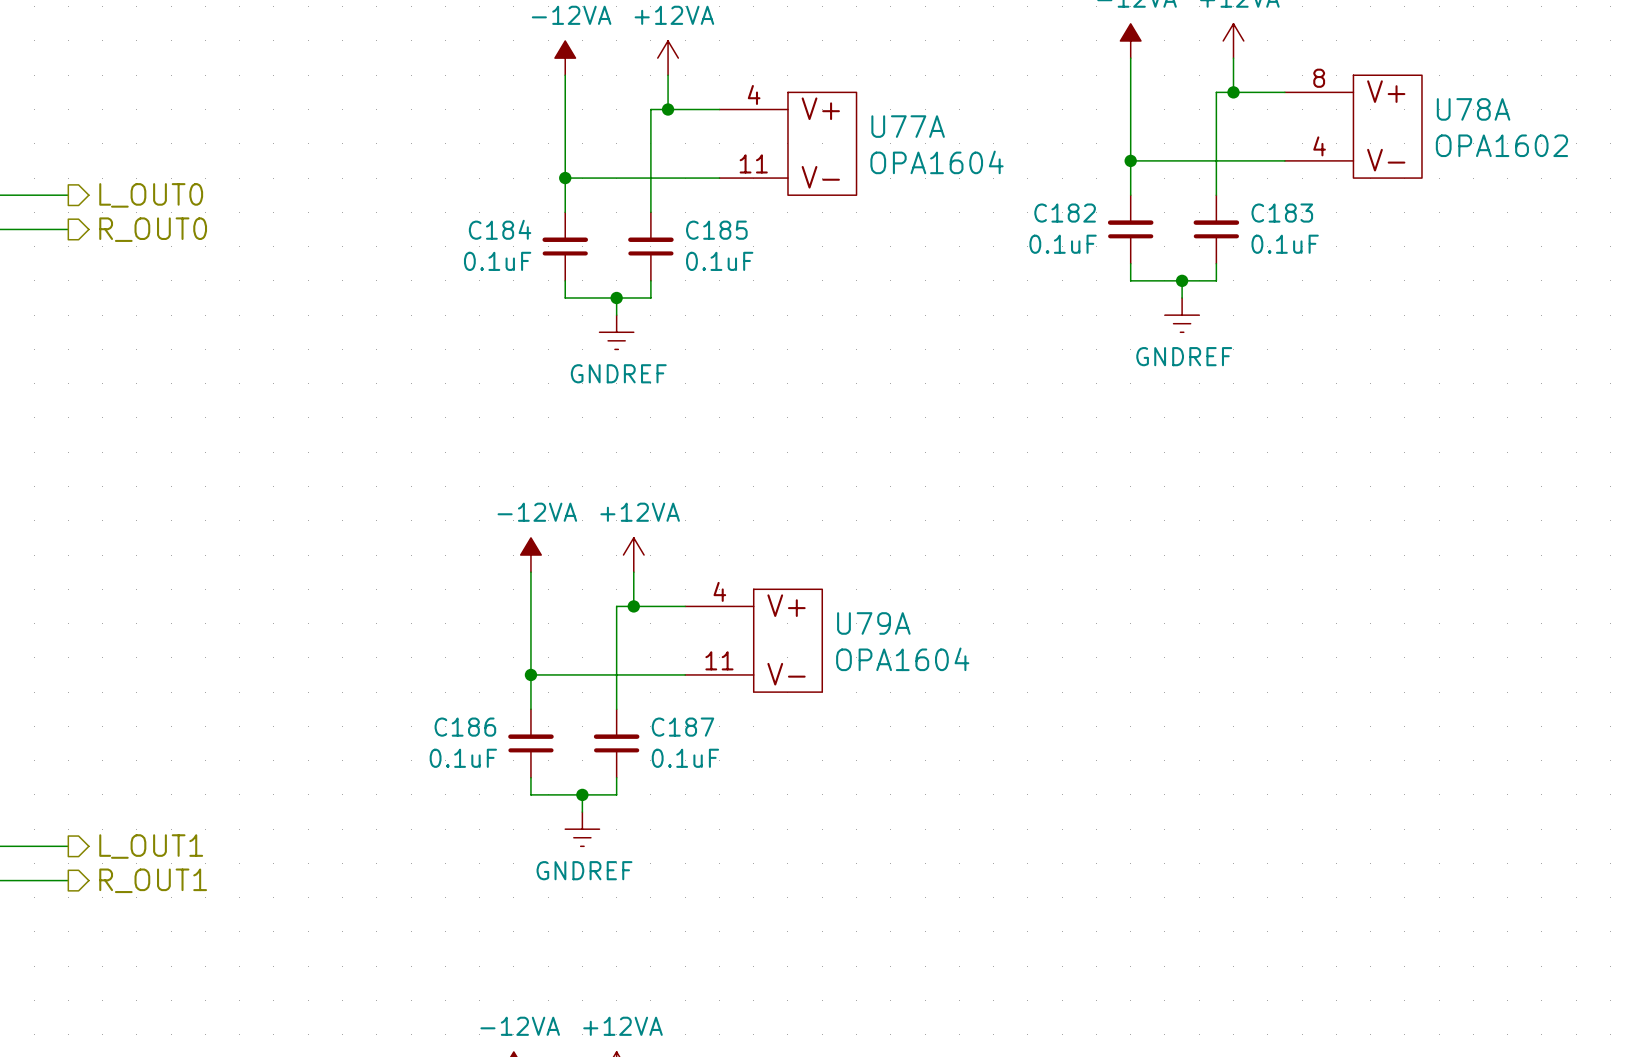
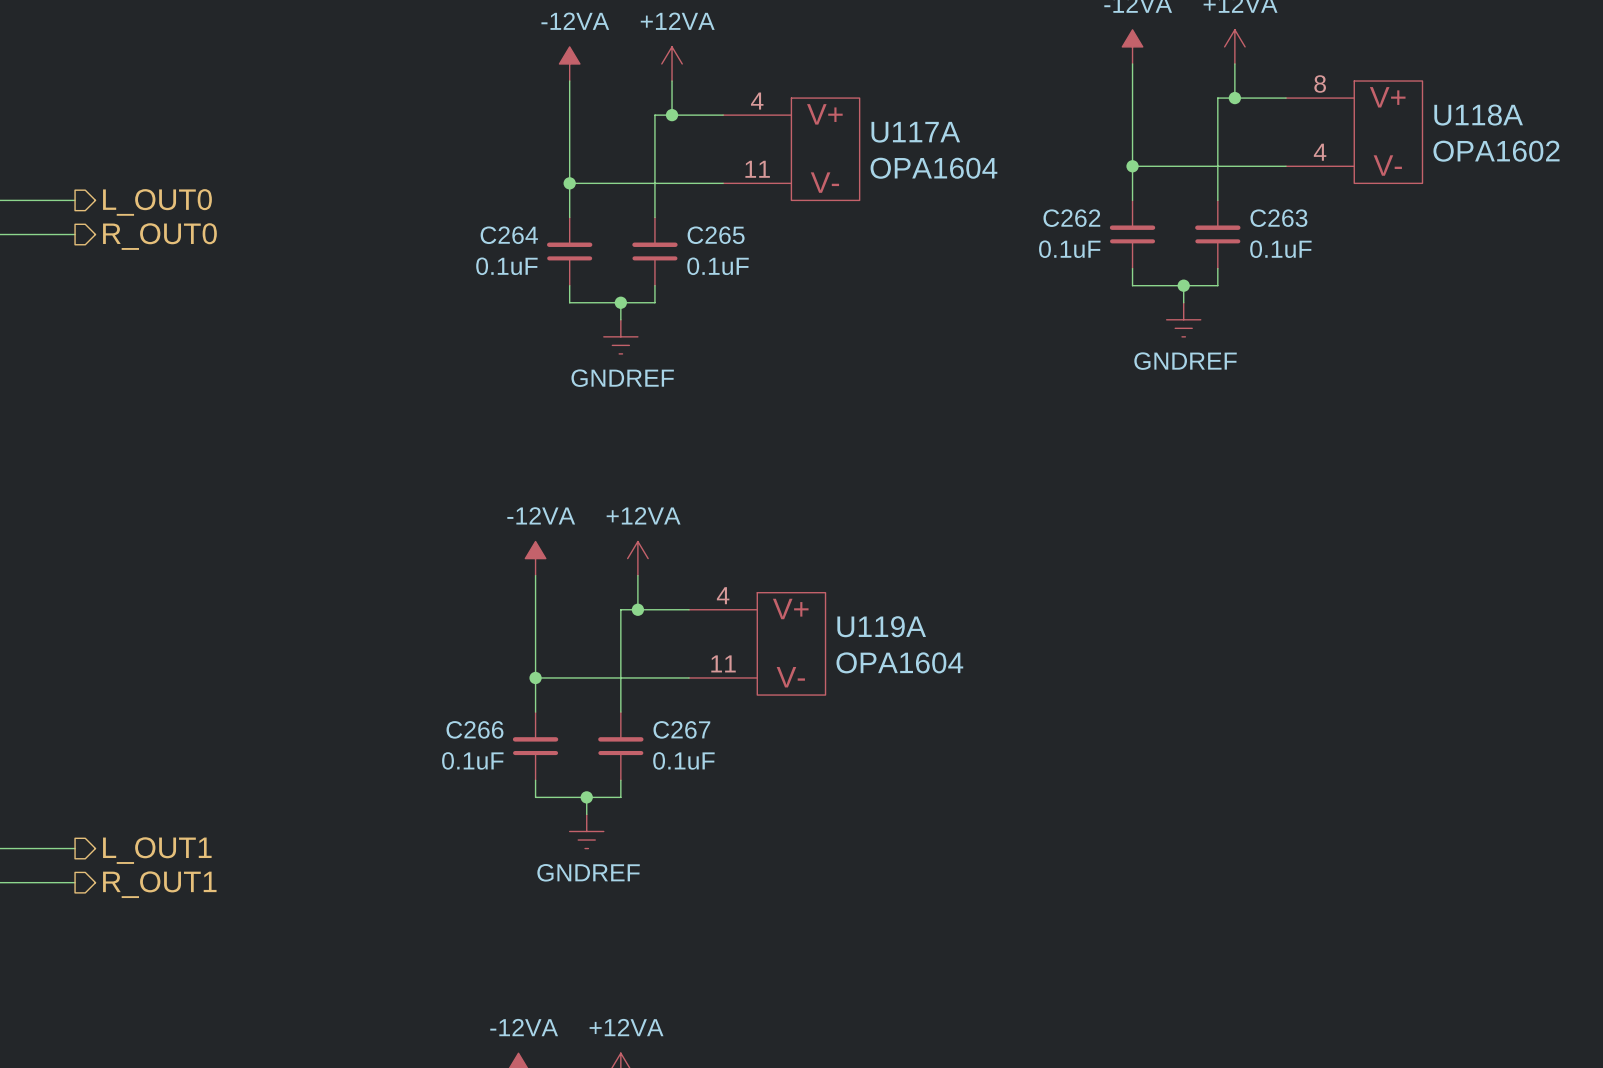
U78A name: U78A (1473, 109) -> U118A (1478, 115)
U77A name: U77A (908, 126) -> U117A (915, 132)
C182 name: C182 (1065, 213) -> C262 (1071, 218)
C183 name: C183 (1282, 213) -> C263 (1278, 218)
C184 name: C184 (500, 229) -> C264 (509, 235)
C185 name: C185 (716, 230) -> C265 (716, 235)
U79A name: U79A (873, 623) -> U119A (881, 626)
C186 name: C186 (465, 727) -> C266 (474, 729)
C187 name: C187 (682, 727) -> C267 (681, 729)

